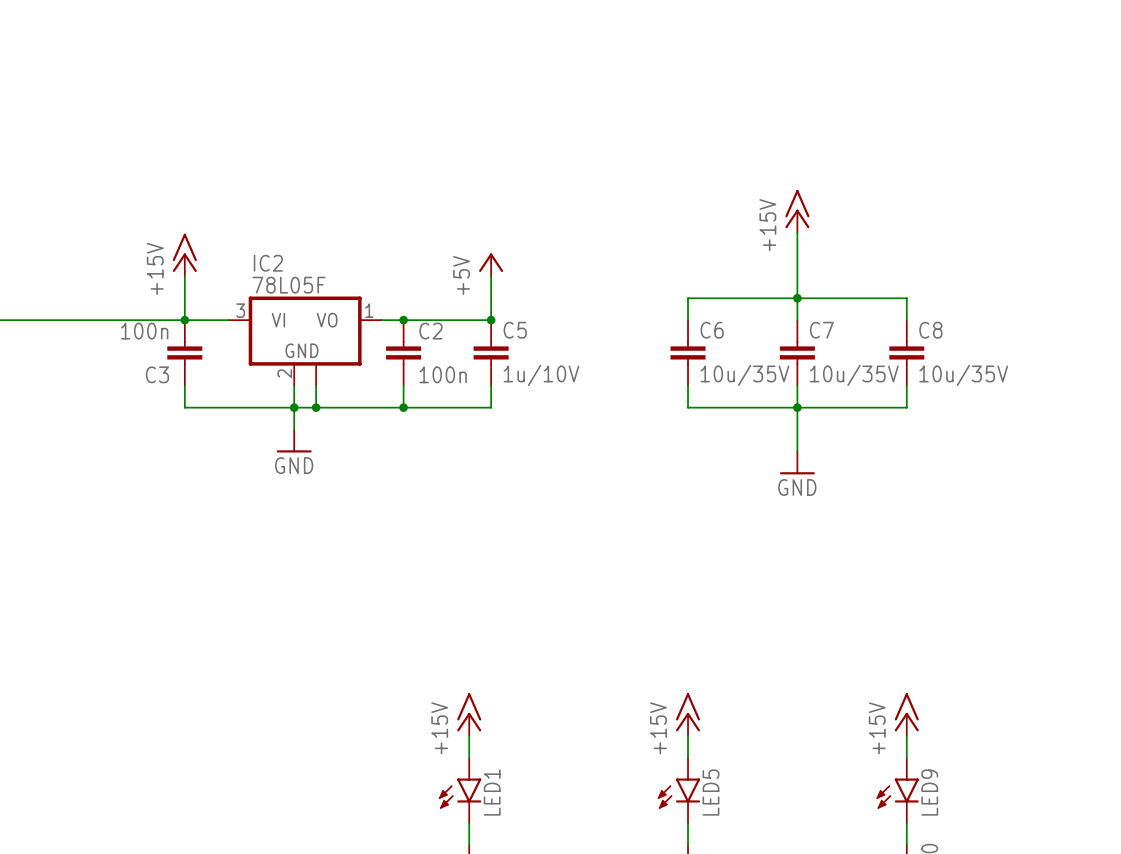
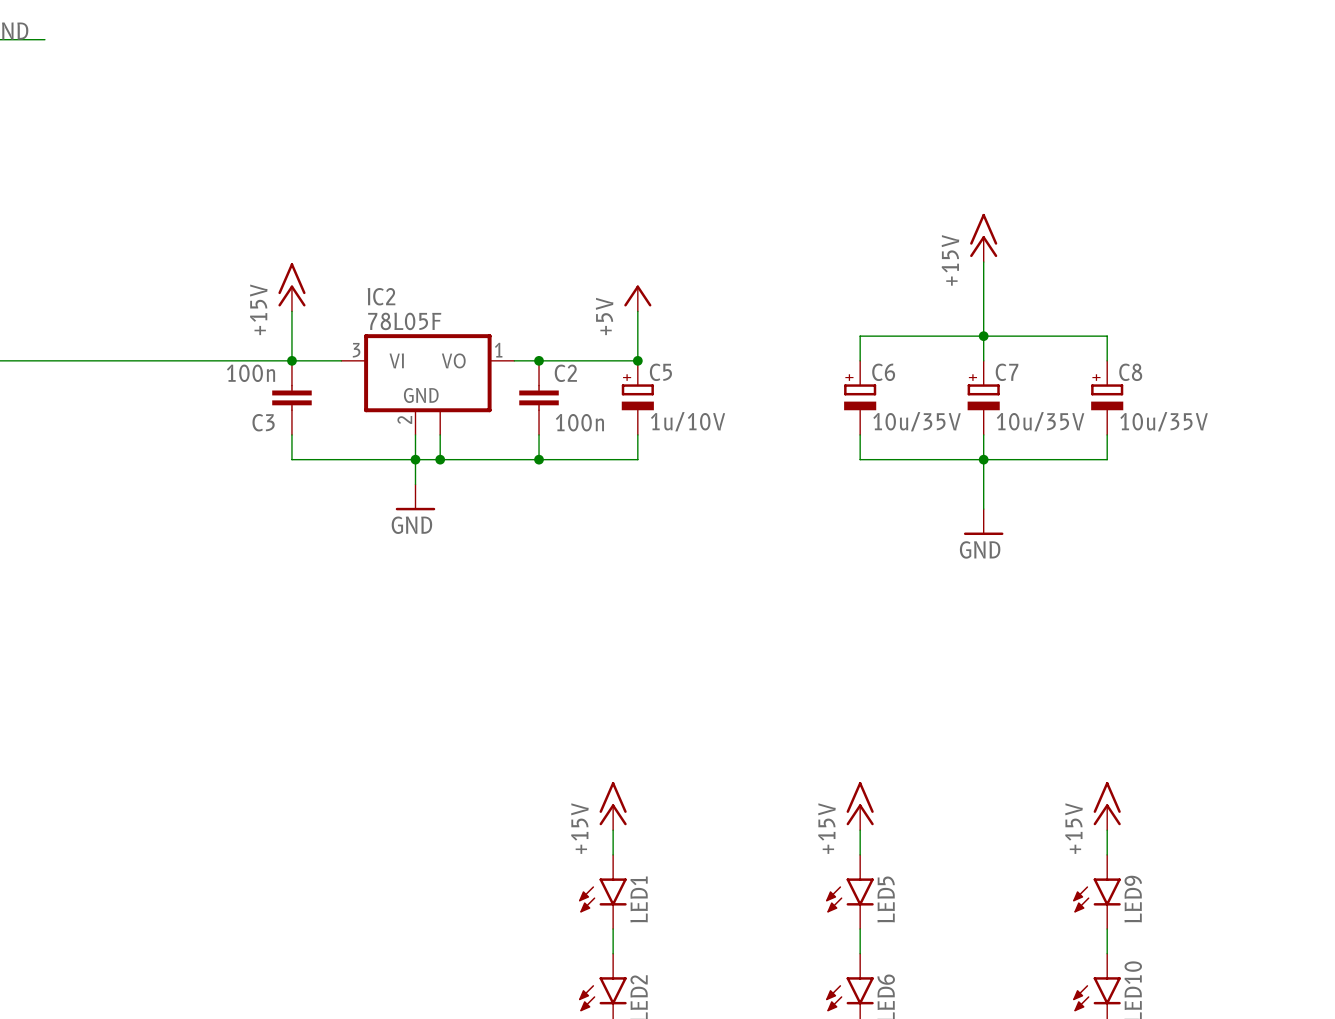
C5 symbol: [473, 320, 509, 386] -> [621, 360, 654, 435]
C6 symbol: [670, 320, 706, 386] -> [844, 360, 877, 435]
C7 symbol: [779, 320, 815, 386] -> [967, 360, 1000, 435]
C8 symbol: [889, 320, 925, 386] -> [1091, 360, 1124, 435]

